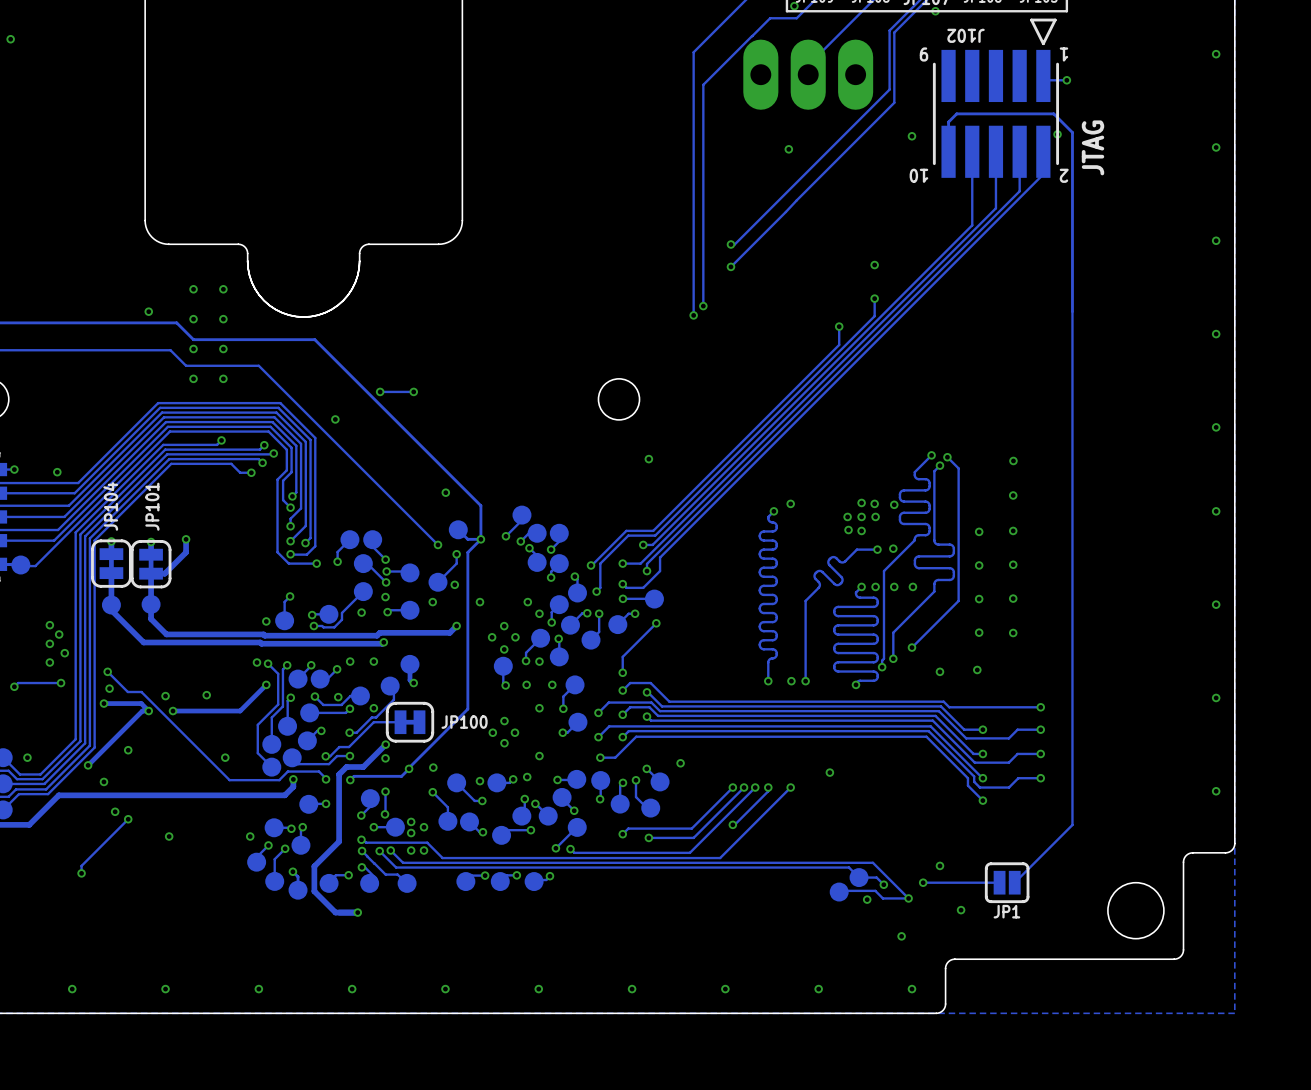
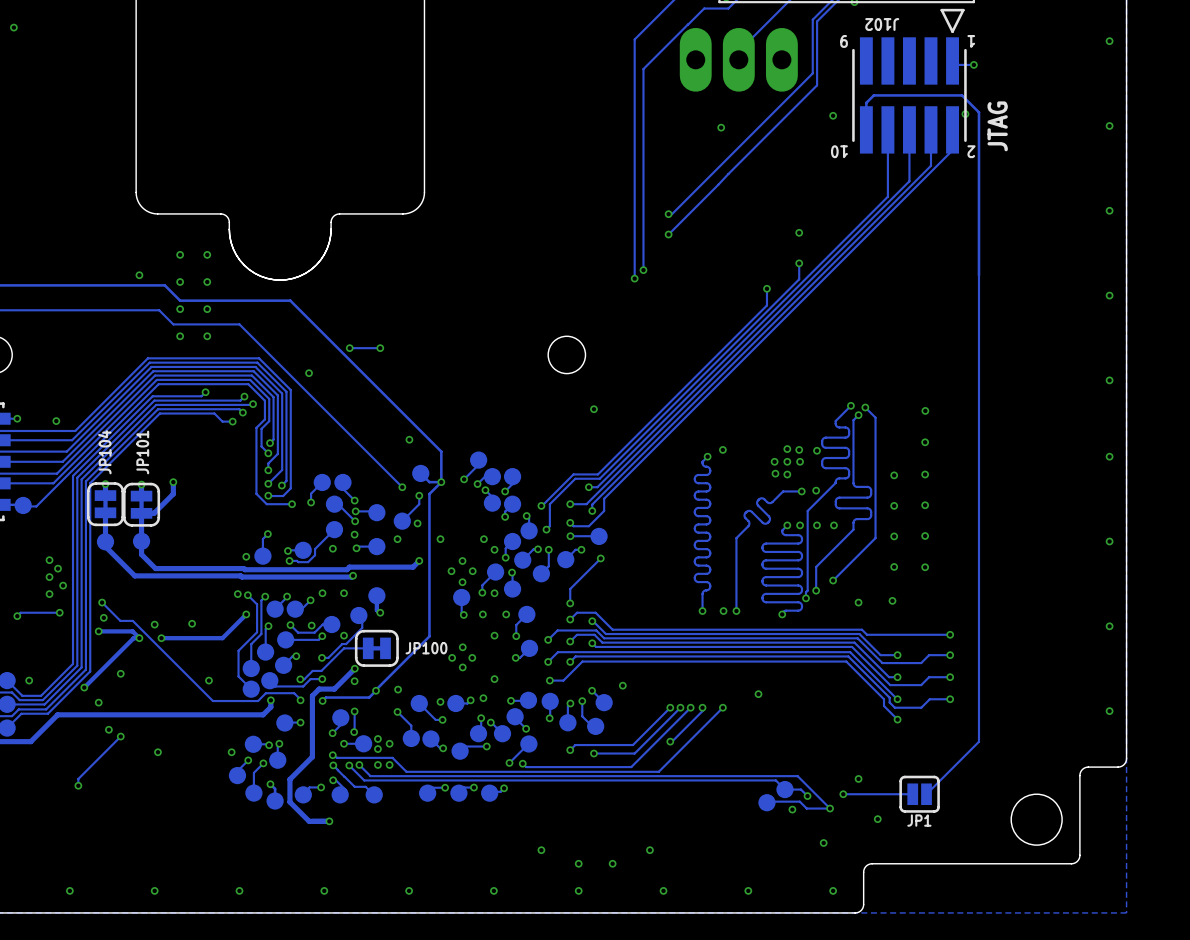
via: none -> (541, 850)
via: none -> (649, 850)
via: none -> (578, 863)
via: none -> (612, 863)

